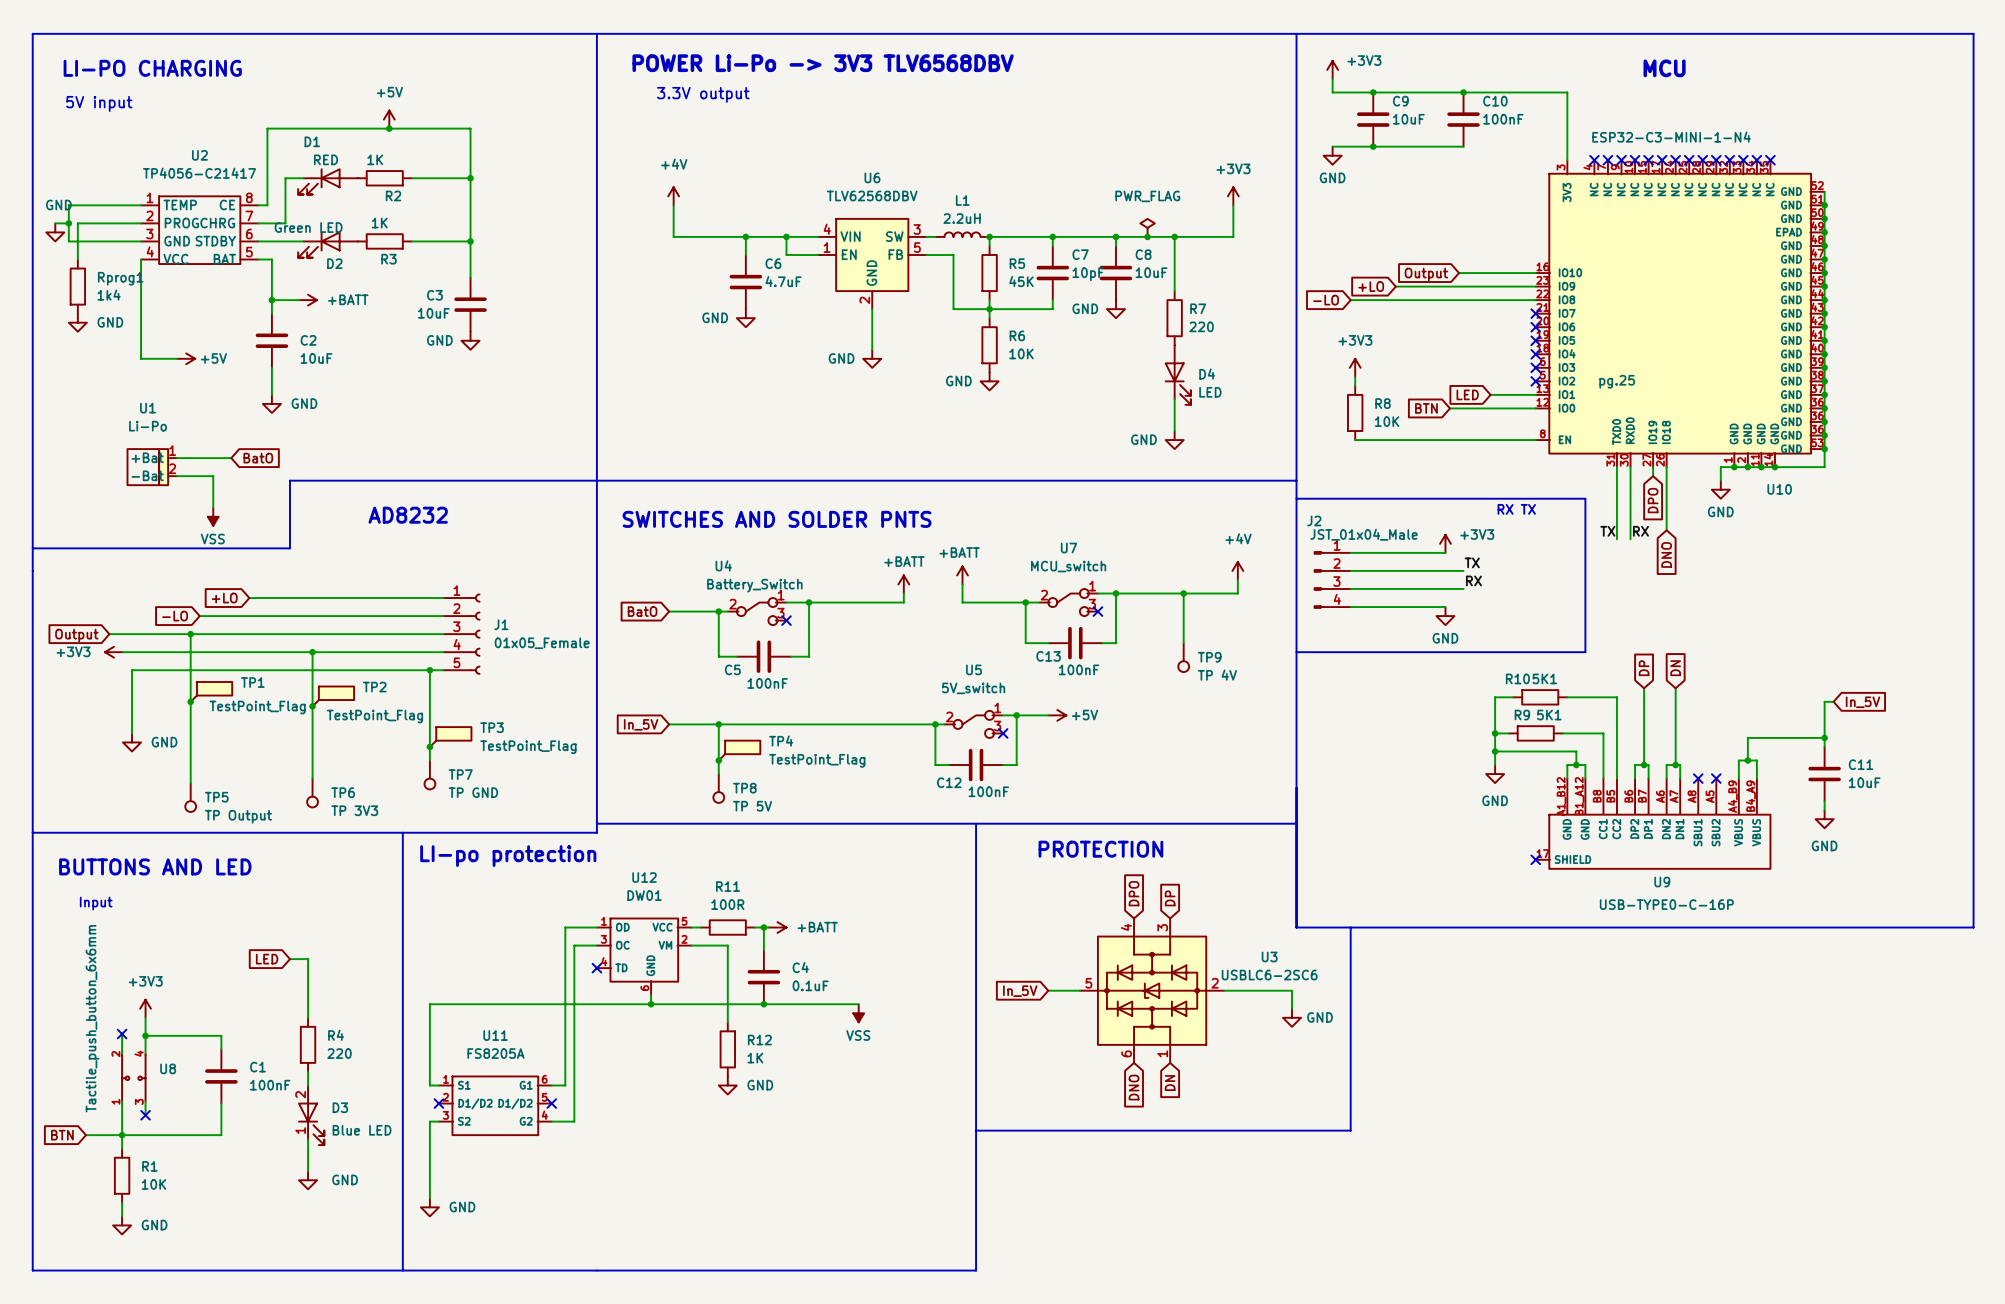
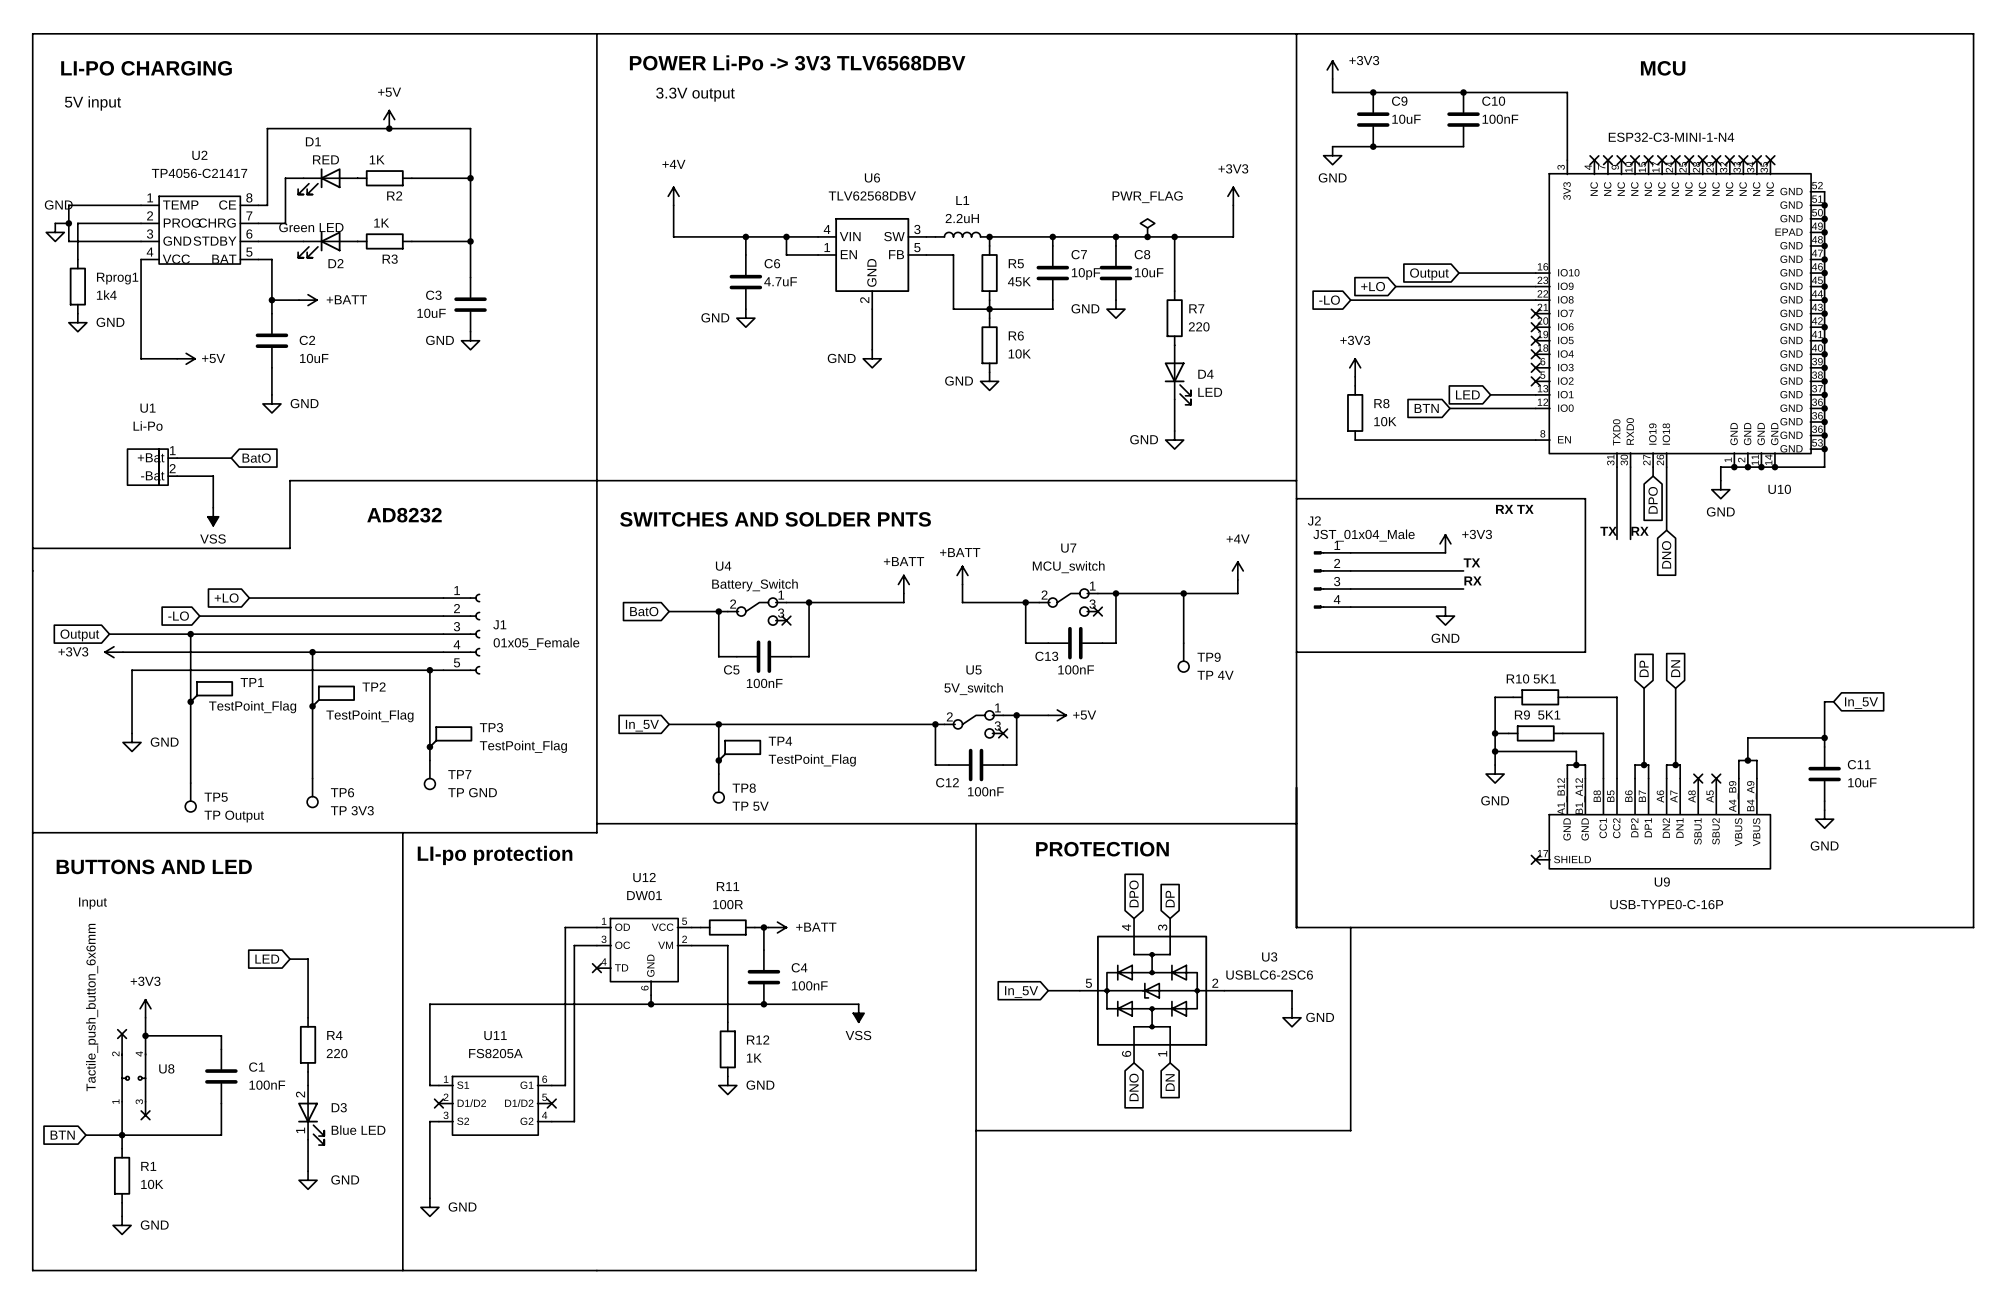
U10 text: pg.25 (1617, 381) -> none
C4 value: 0.1uF (810, 985) -> 100nF (809, 985)

